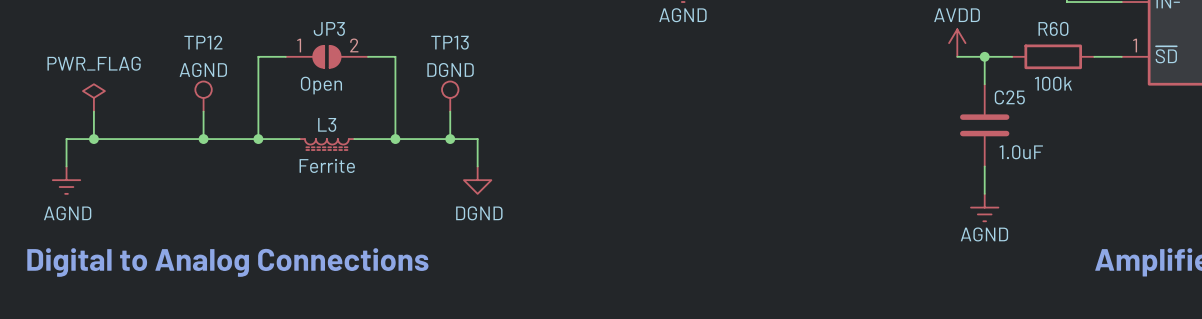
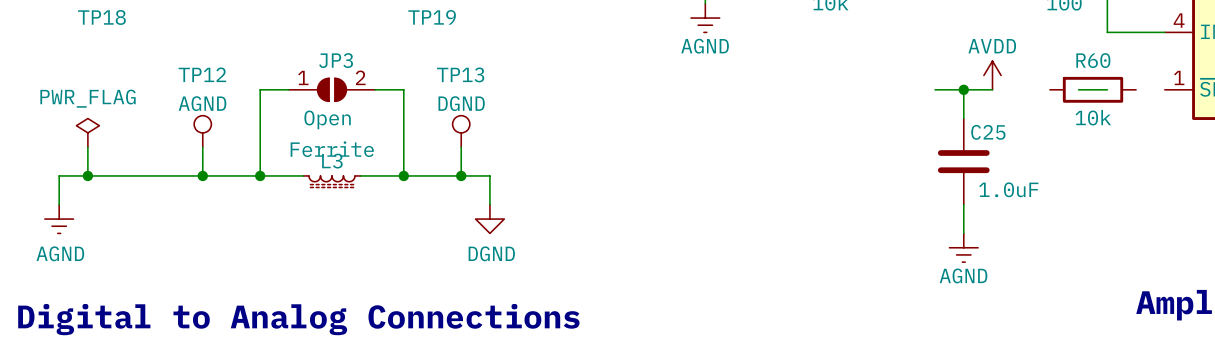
wire: (957, 56) (1012, 56) -> (992, 89) (935, 89)
wire: (984, 56) (984, 84) -> (963, 89) (963, 118)
junction position: (984, 56) -> (963, 89)
wire: (1094, 56) (1121, 56) -> (1078, 89) (1107, 89)
R60 value: 100k (1053, 83) -> 10k (1093, 117)
C25 position: (984, 125) -> (963, 161)
L3 value position: Ferrite (327, 165) -> Ferrite (332, 149)
wire: (984, 166) (984, 193) -> (963, 204) (963, 233)
power symbol position: AGND (984, 207) -> AGND (963, 247)
text position: Digital to Analog Connections (227, 262) -> Digital to Analog Connections (298, 319)

